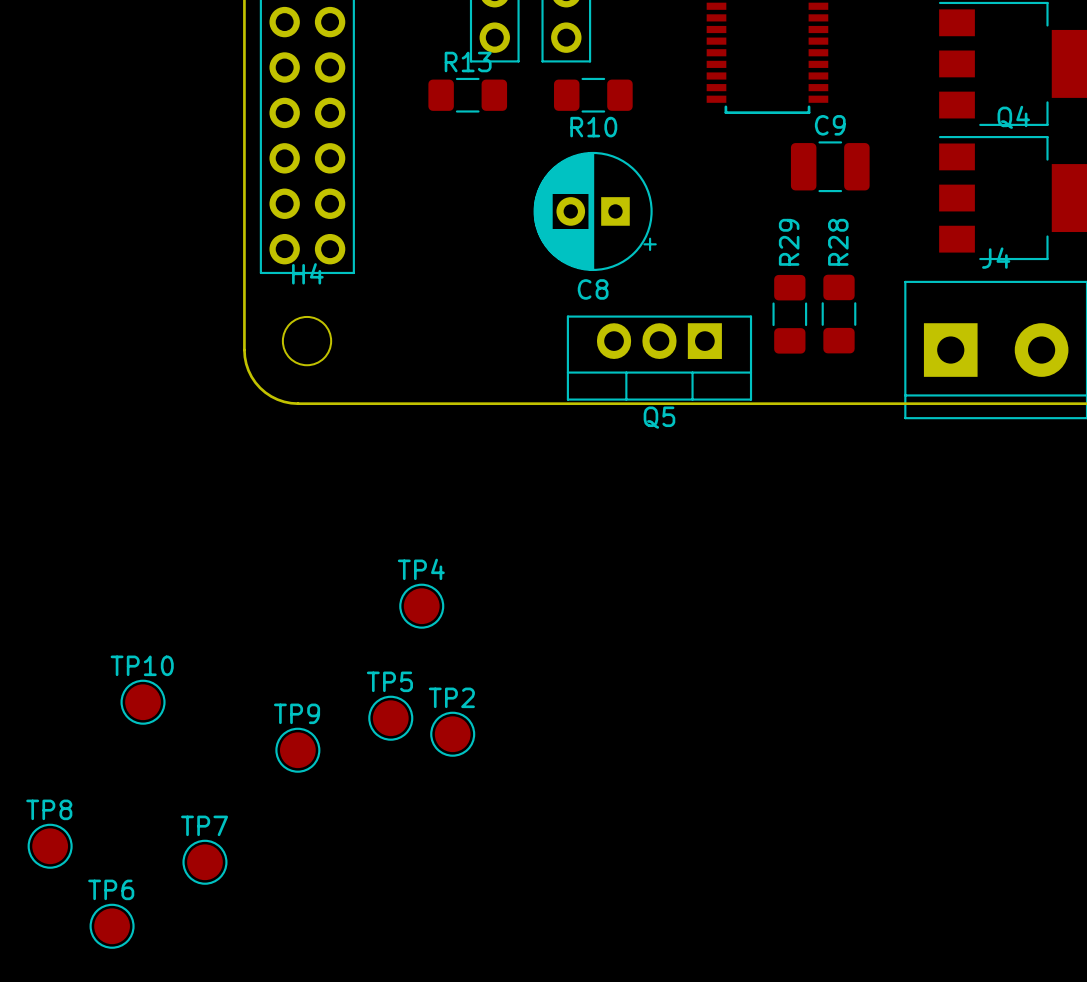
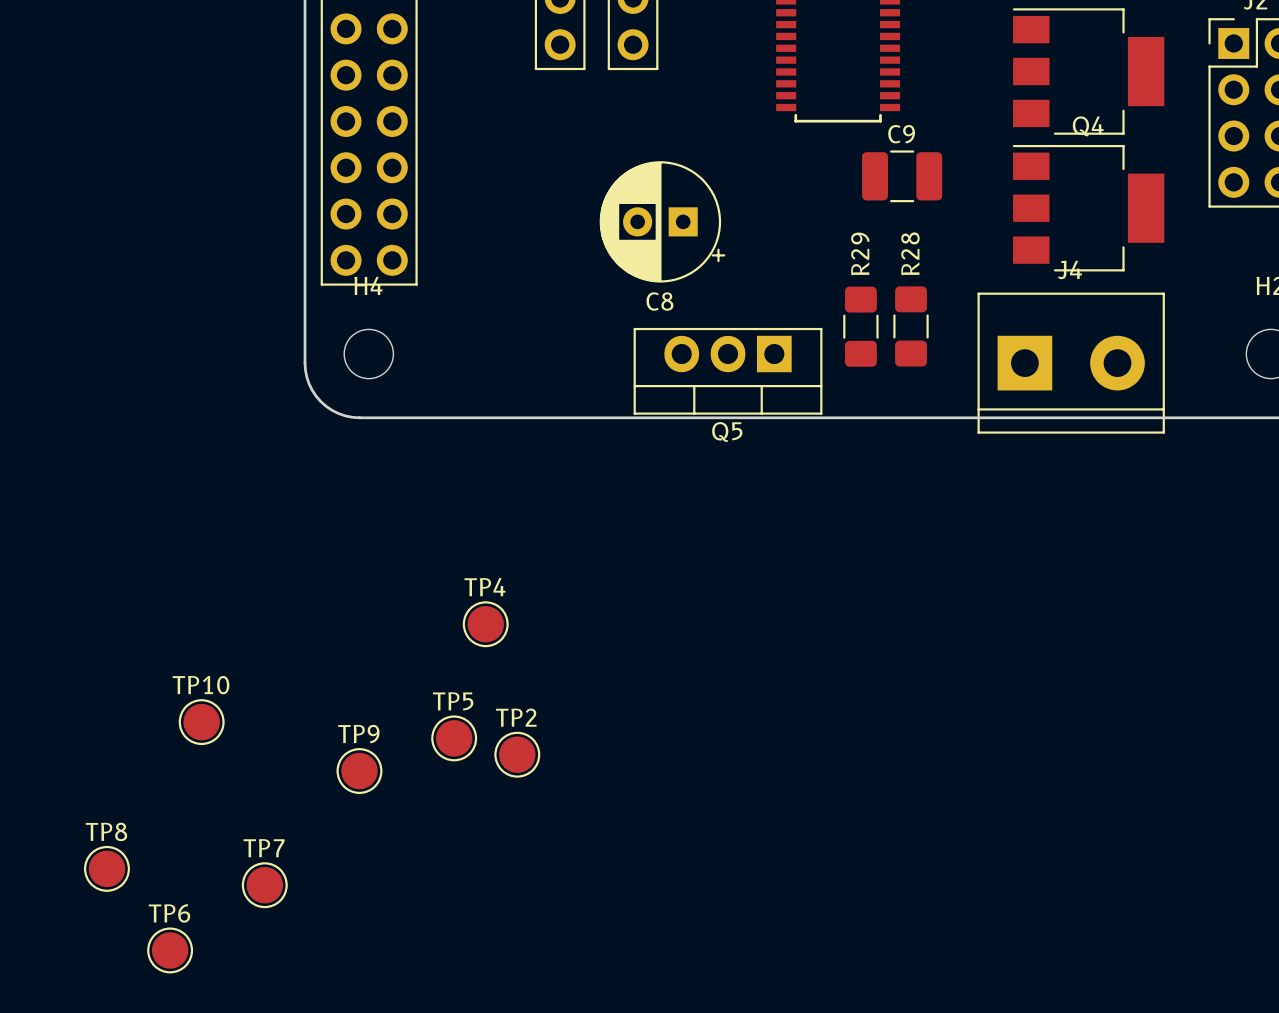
R13: (467, 95) -> none
R10: (593, 95) -> none

